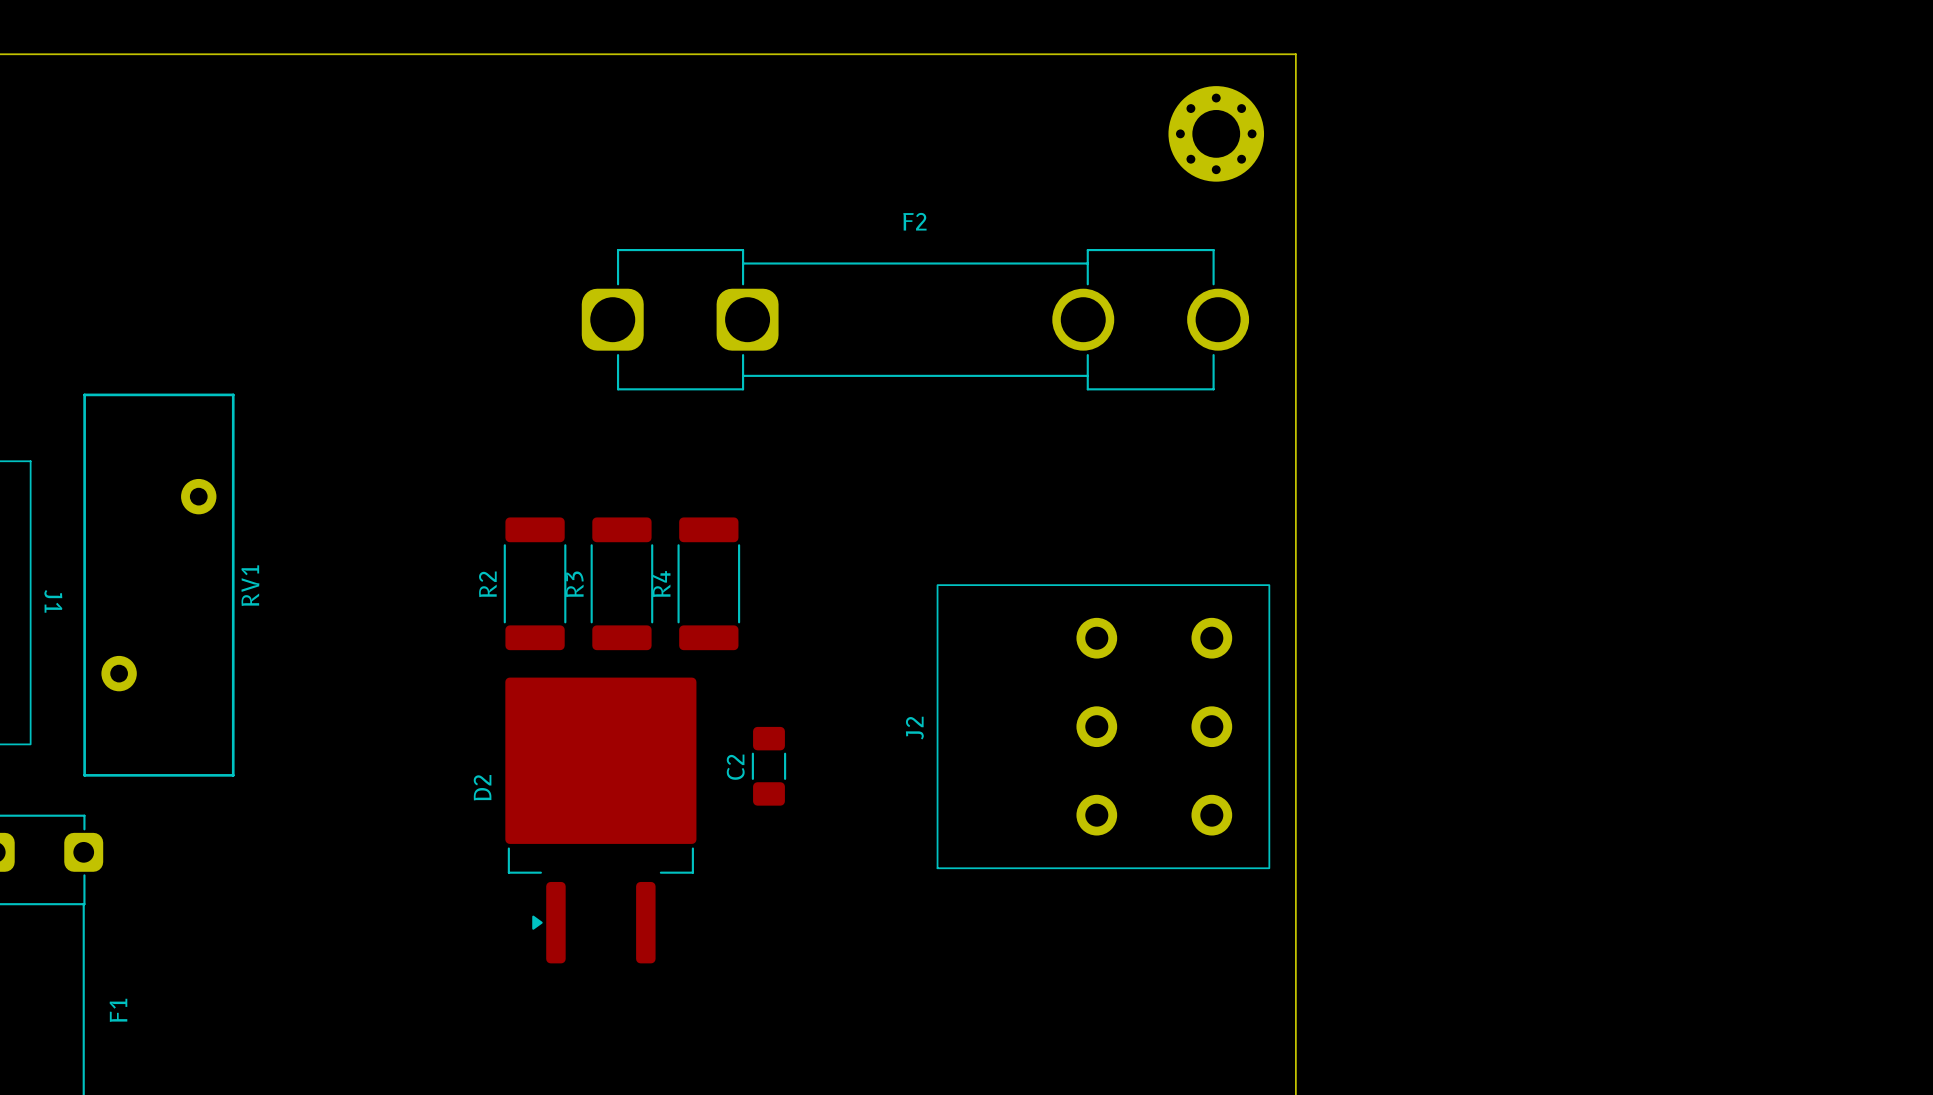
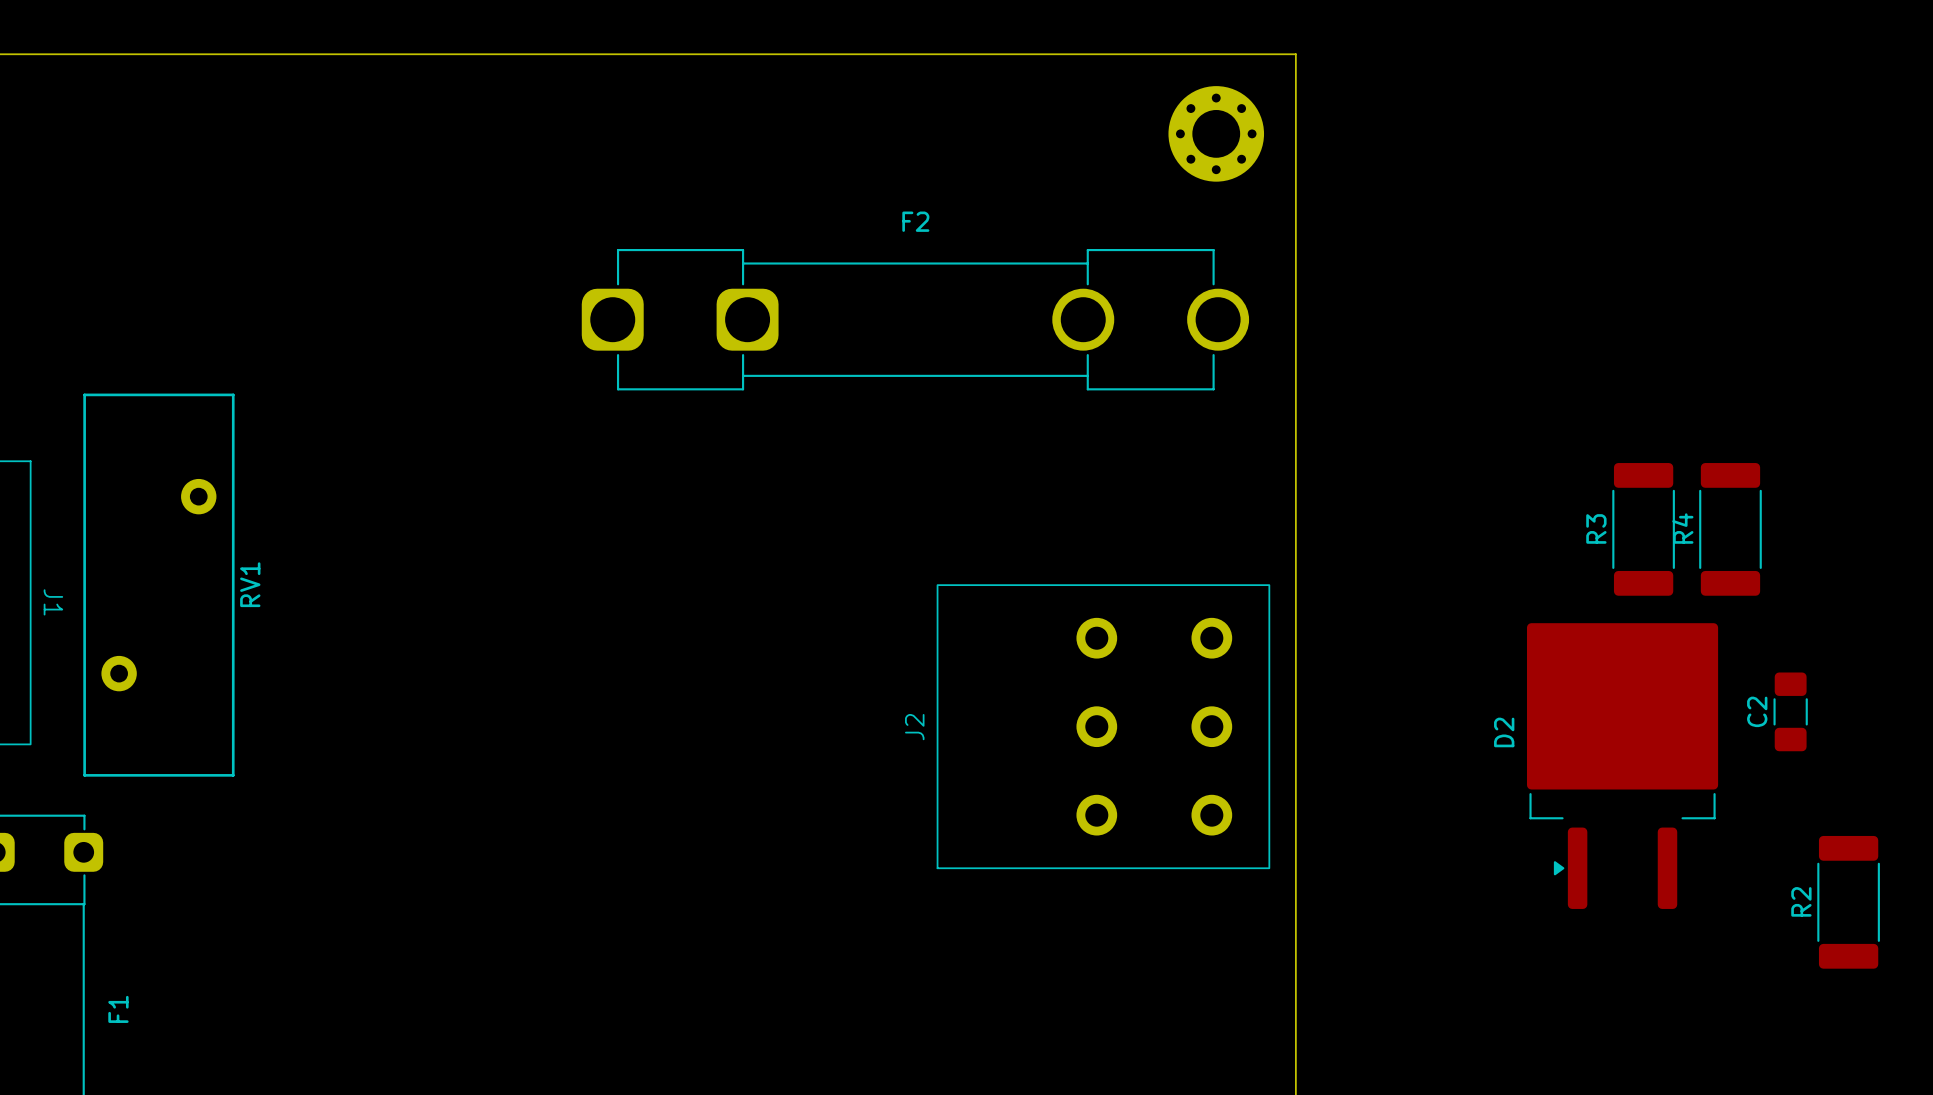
R2 position: (535, 583) -> (1848, 902)
R3 position: (621, 583) -> (1643, 529)
R4 position: (708, 583) -> (1730, 529)
C2 position: (768, 766) -> (1790, 711)
D2 position: (600, 820) -> (1622, 766)

